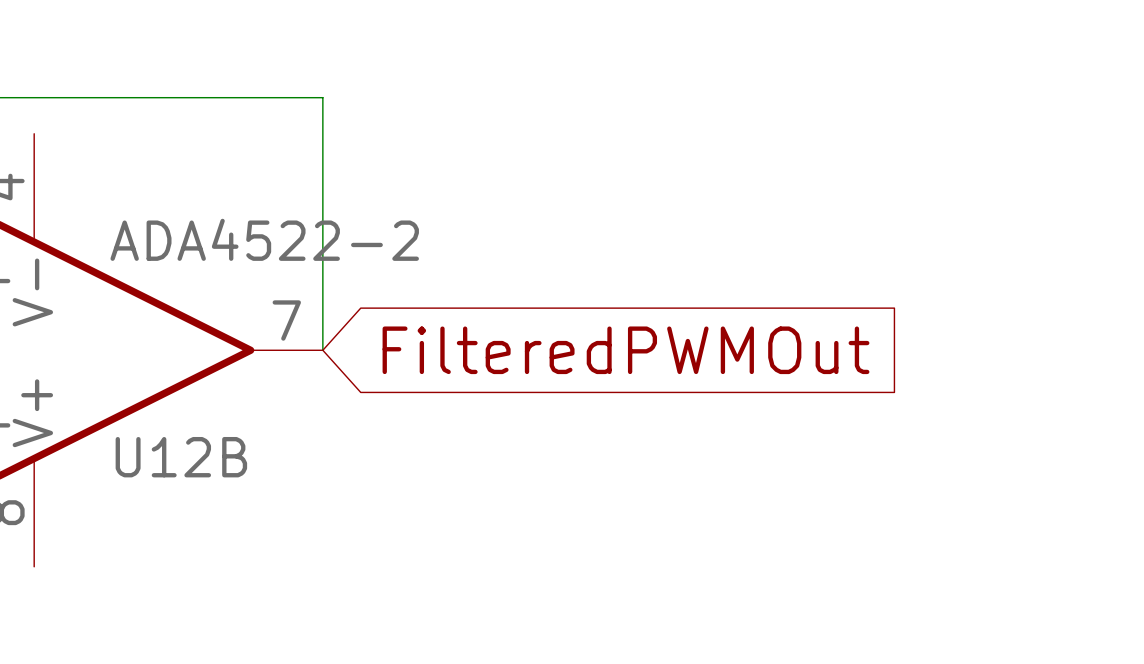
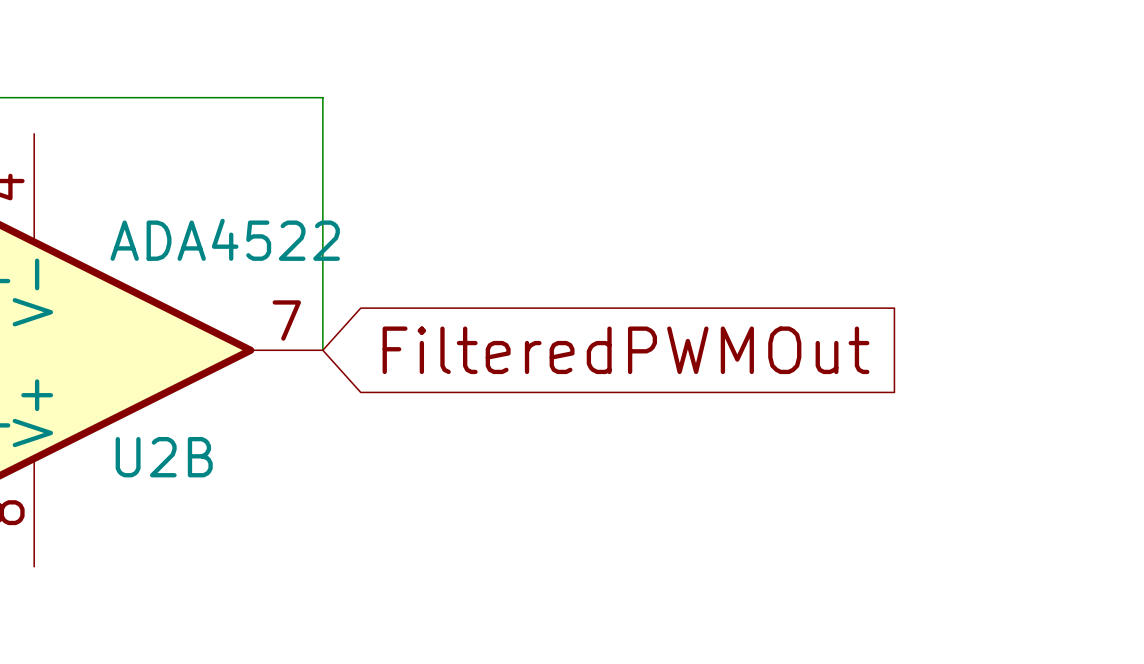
U12B value: ADA4522-2 (264, 239) -> ADA4522 (225, 239)
U12B name: U12B (181, 457) -> U2B (164, 457)

